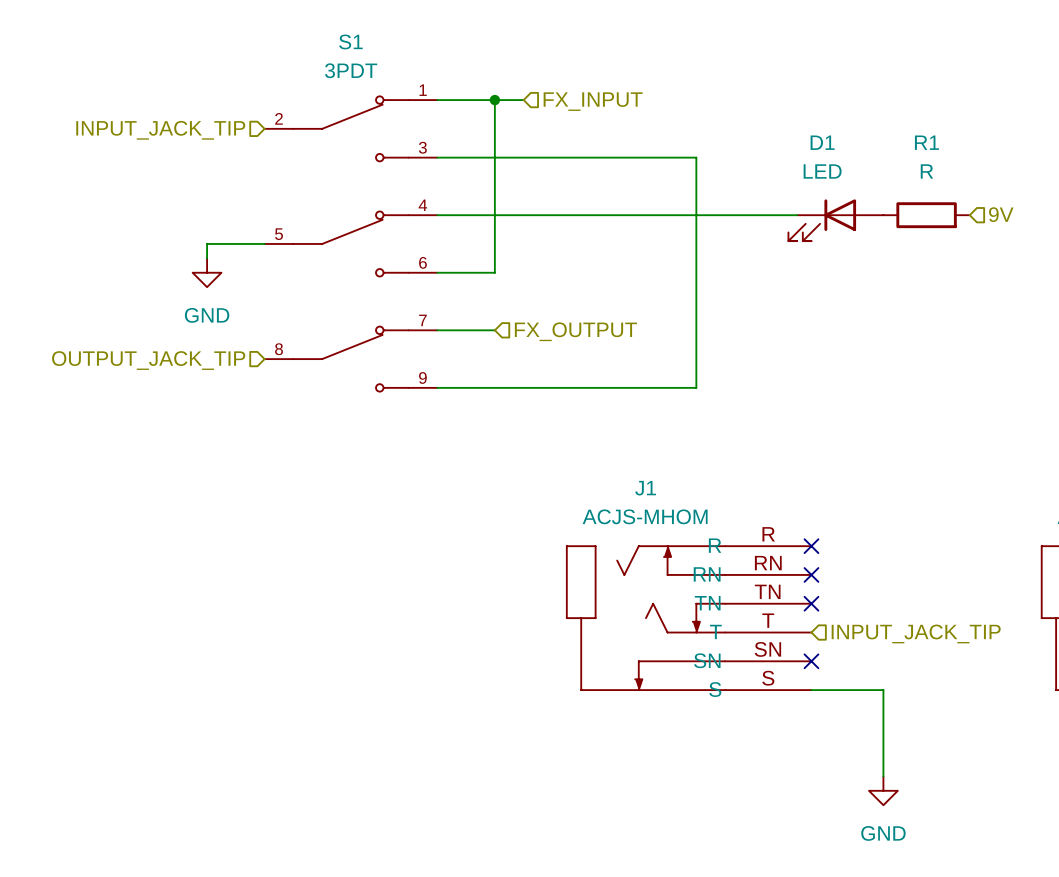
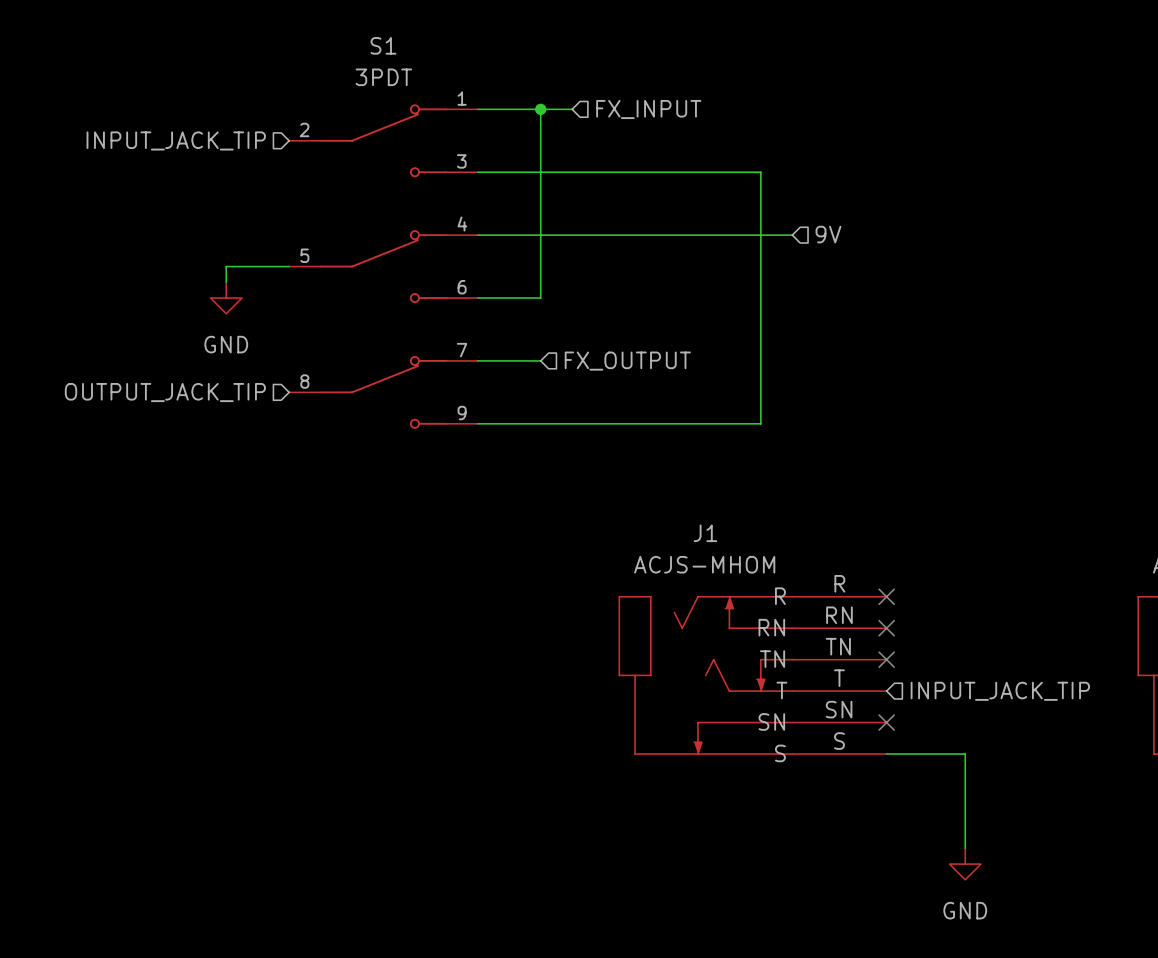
hierarchical label position: 9V (1001, 214) -> 9V (828, 234)
wire: (725, 215) (797, 215) -> none
R1: R (926, 215) -> none
D1: LED (835, 220) -> none

